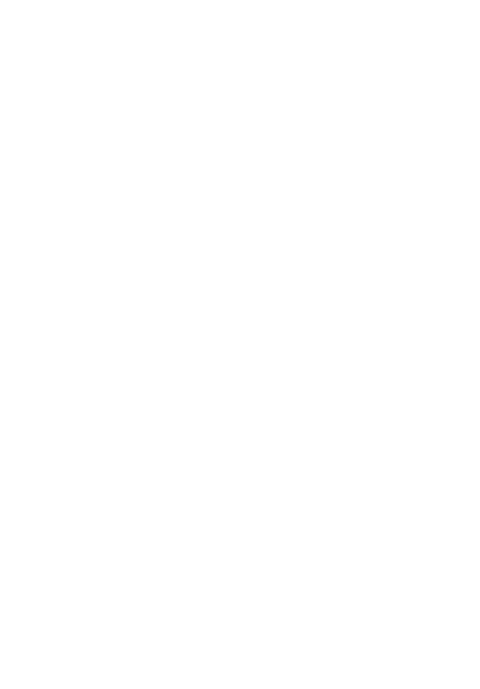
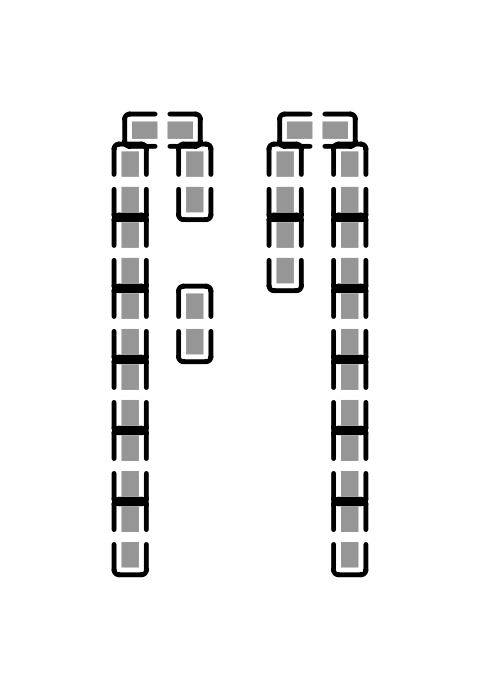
part: none -> (162, 130)
part: none -> (317, 130)
part: none -> (130, 181)
part: none -> (194, 181)
part: none -> (285, 181)
part: none -> (349, 181)
part: none -> (130, 252)
part: none -> (285, 252)
part: none -> (349, 252)
part: none -> (130, 323)
part: none -> (194, 323)
part: none -> (349, 323)
part: none -> (130, 394)
part: none -> (349, 394)
part: none -> (130, 465)
part: none -> (349, 465)
part: none -> (130, 537)
part: none -> (349, 537)

